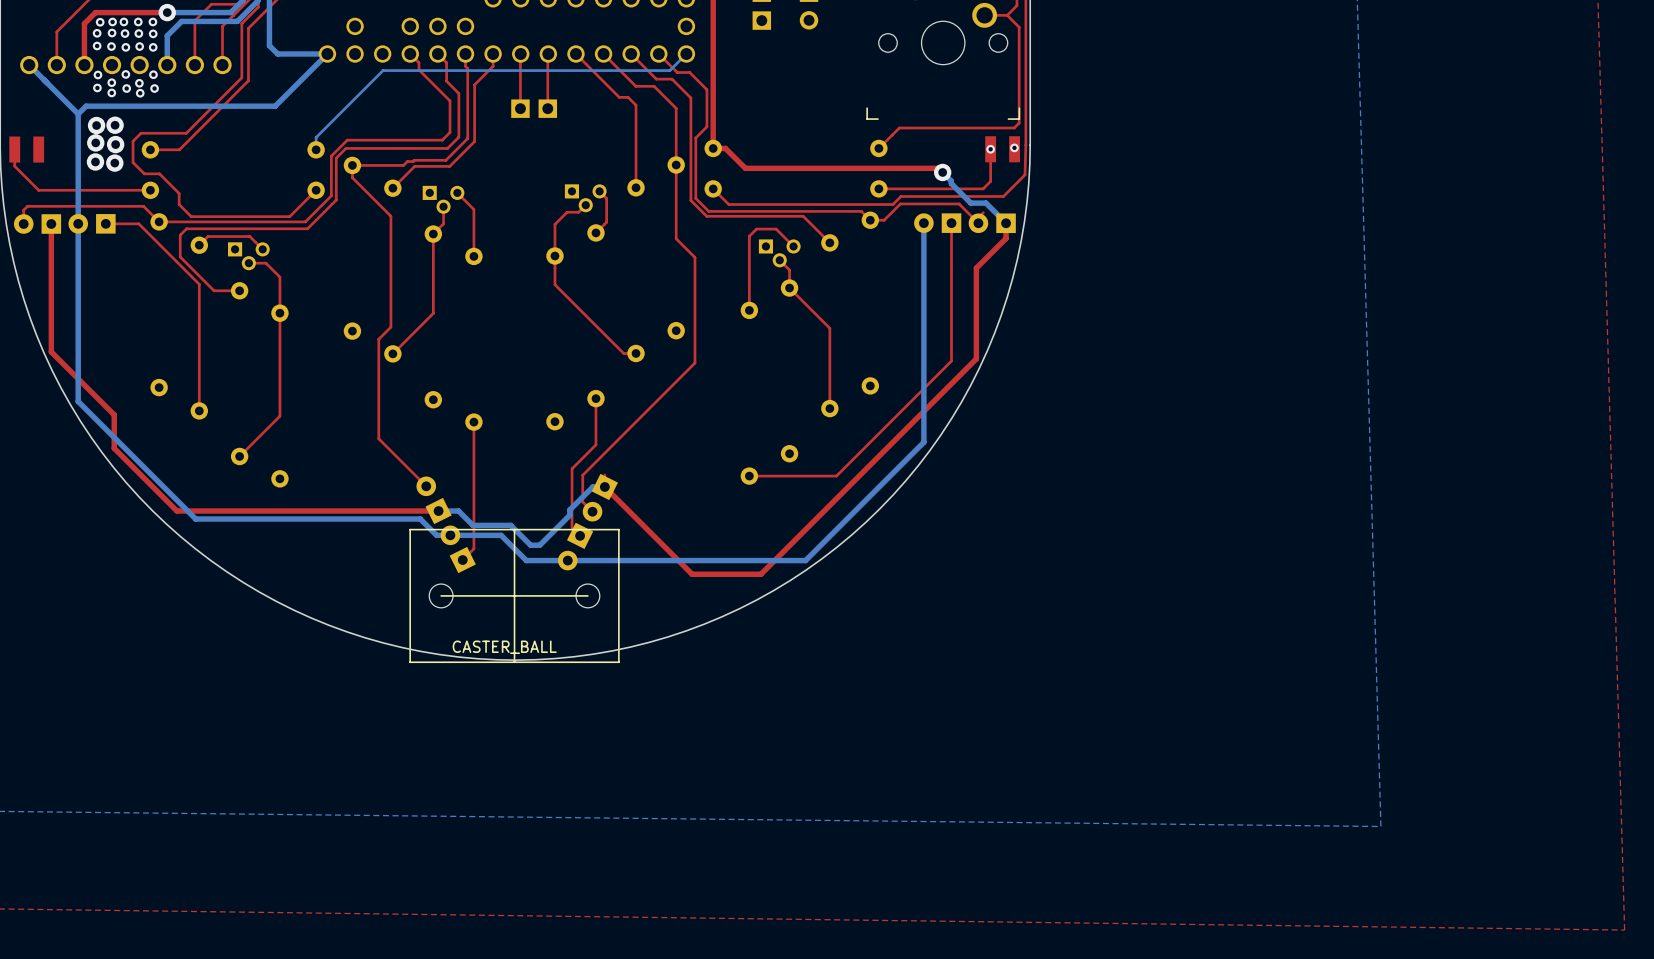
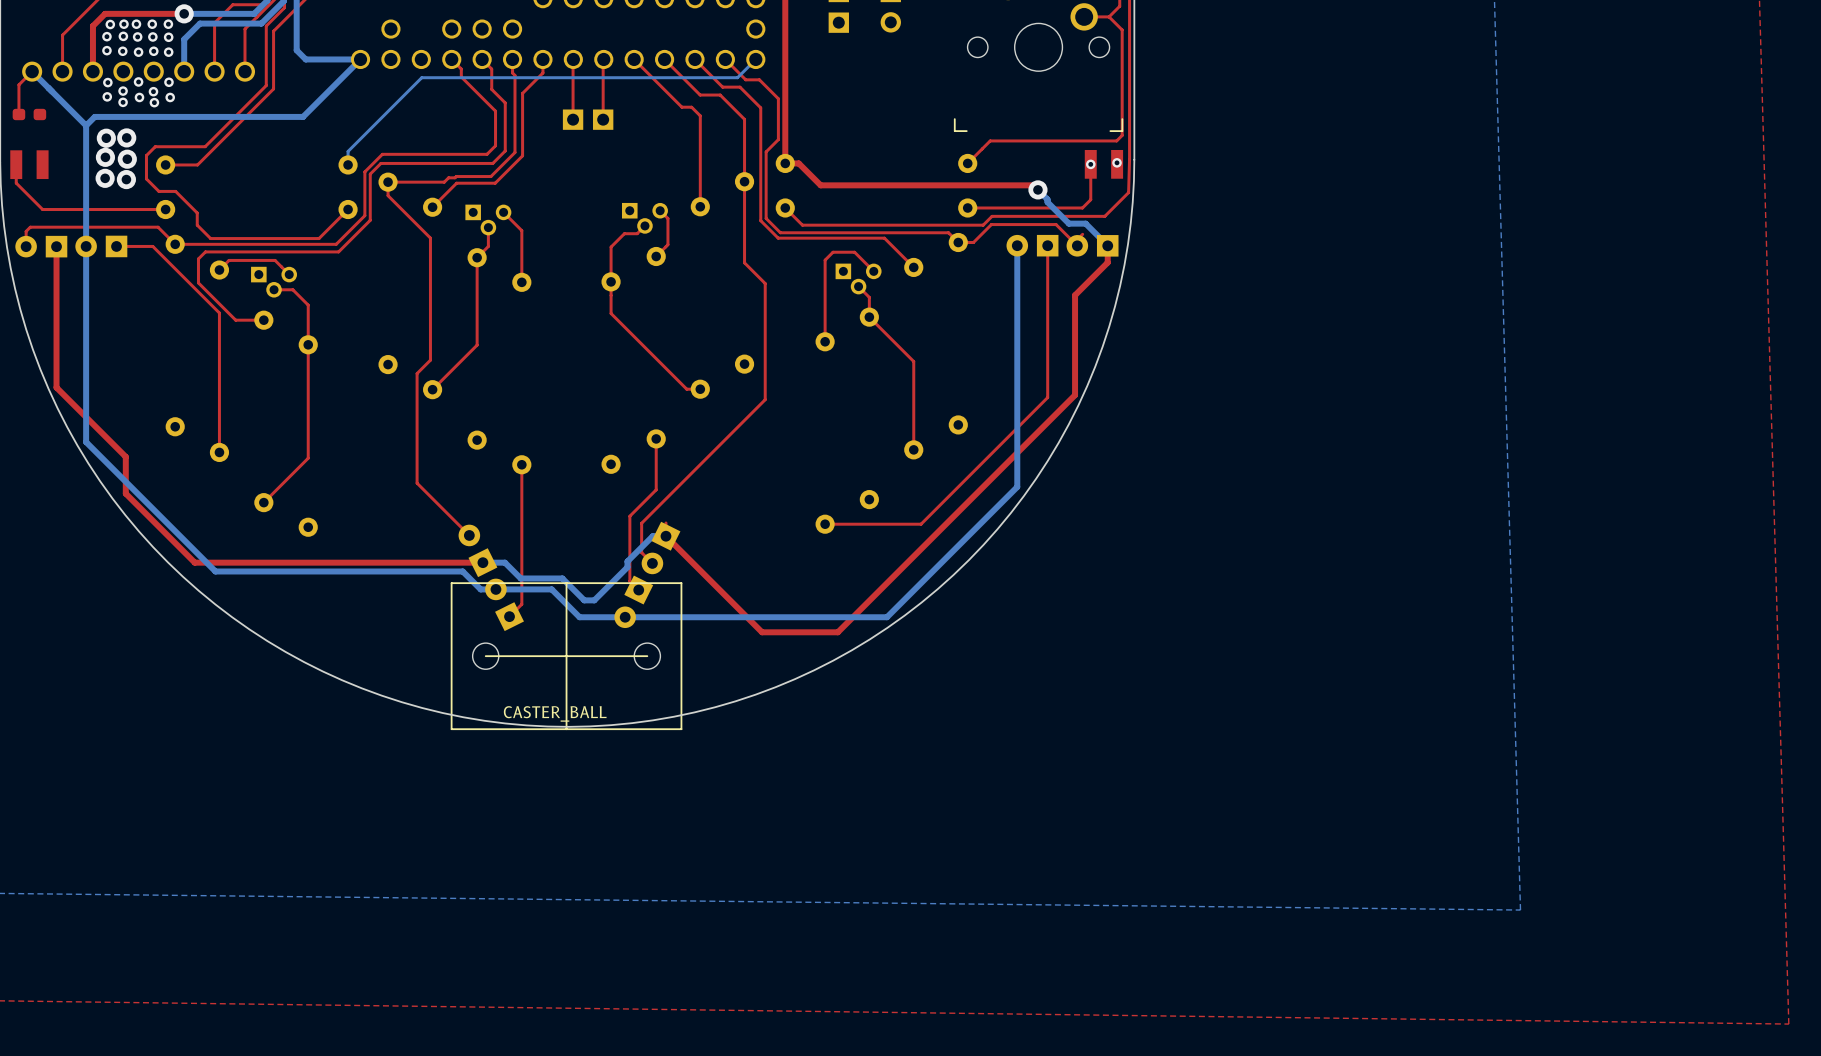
top track: none -> (32, 71) (18, 84) (18, 114)
part: none -> (29, 114)

